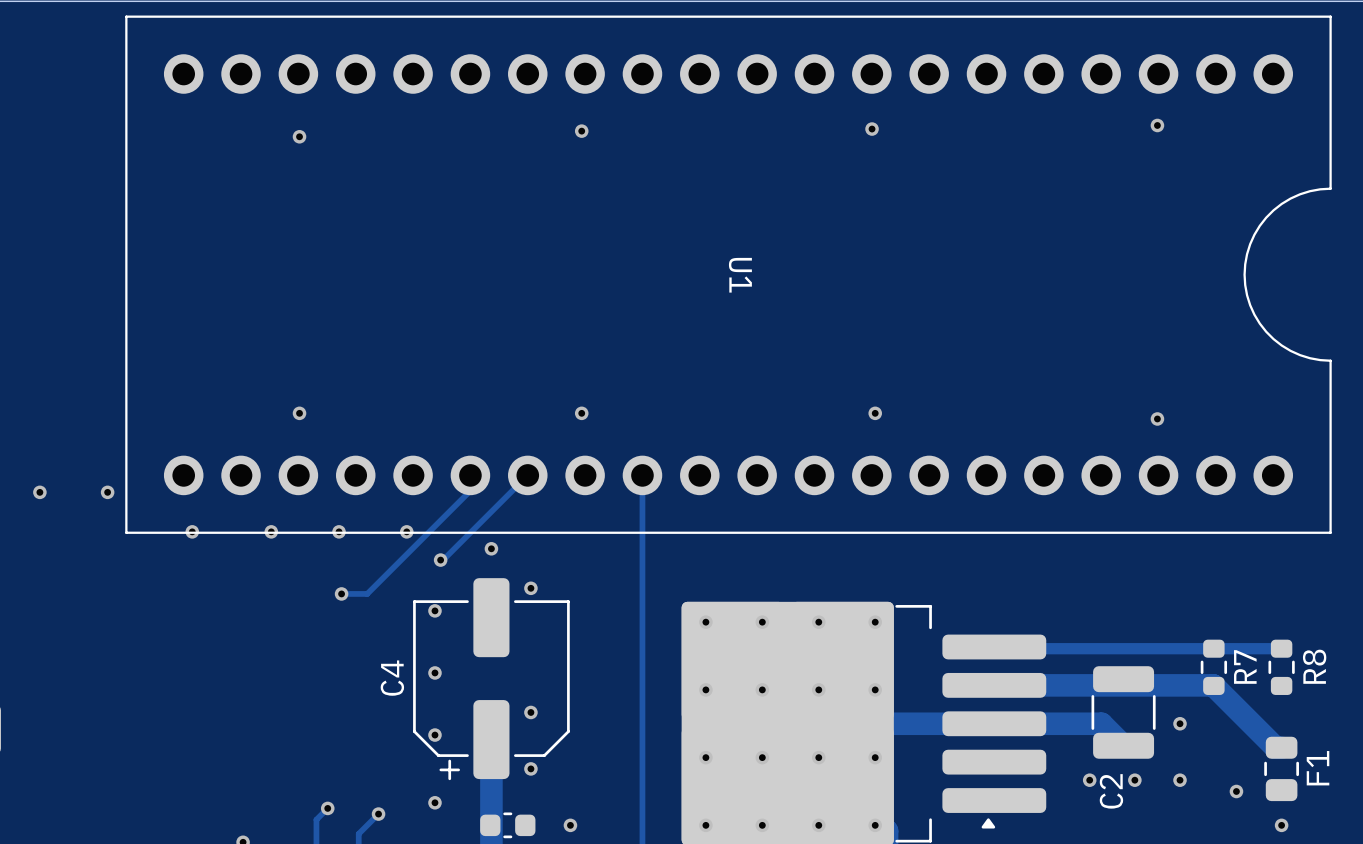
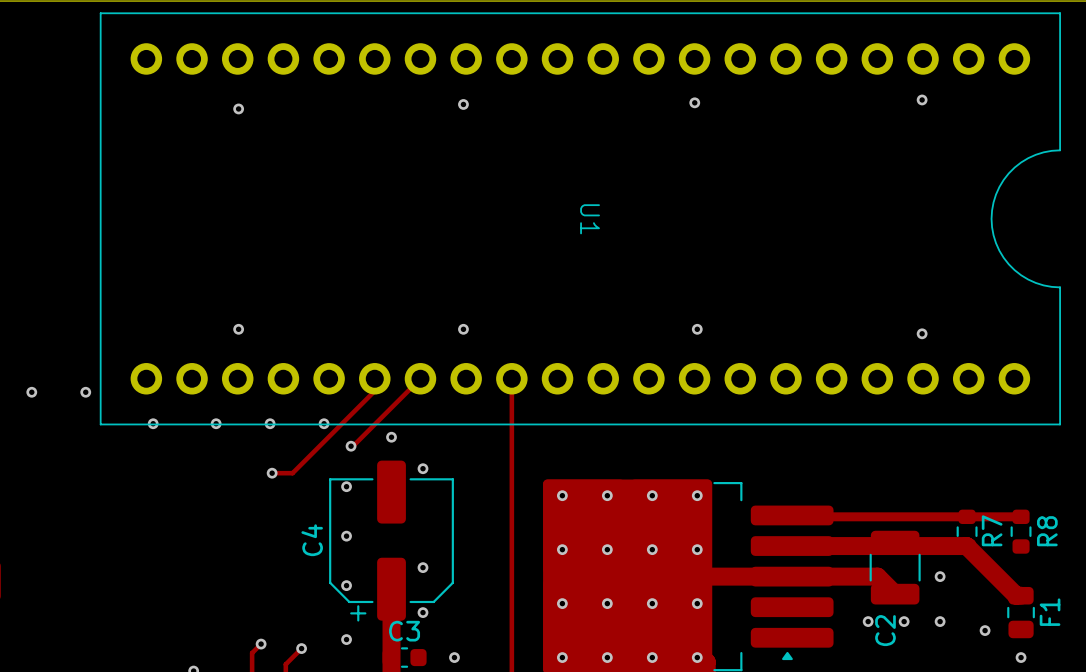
C3 name: none -> C3 (404, 631)

